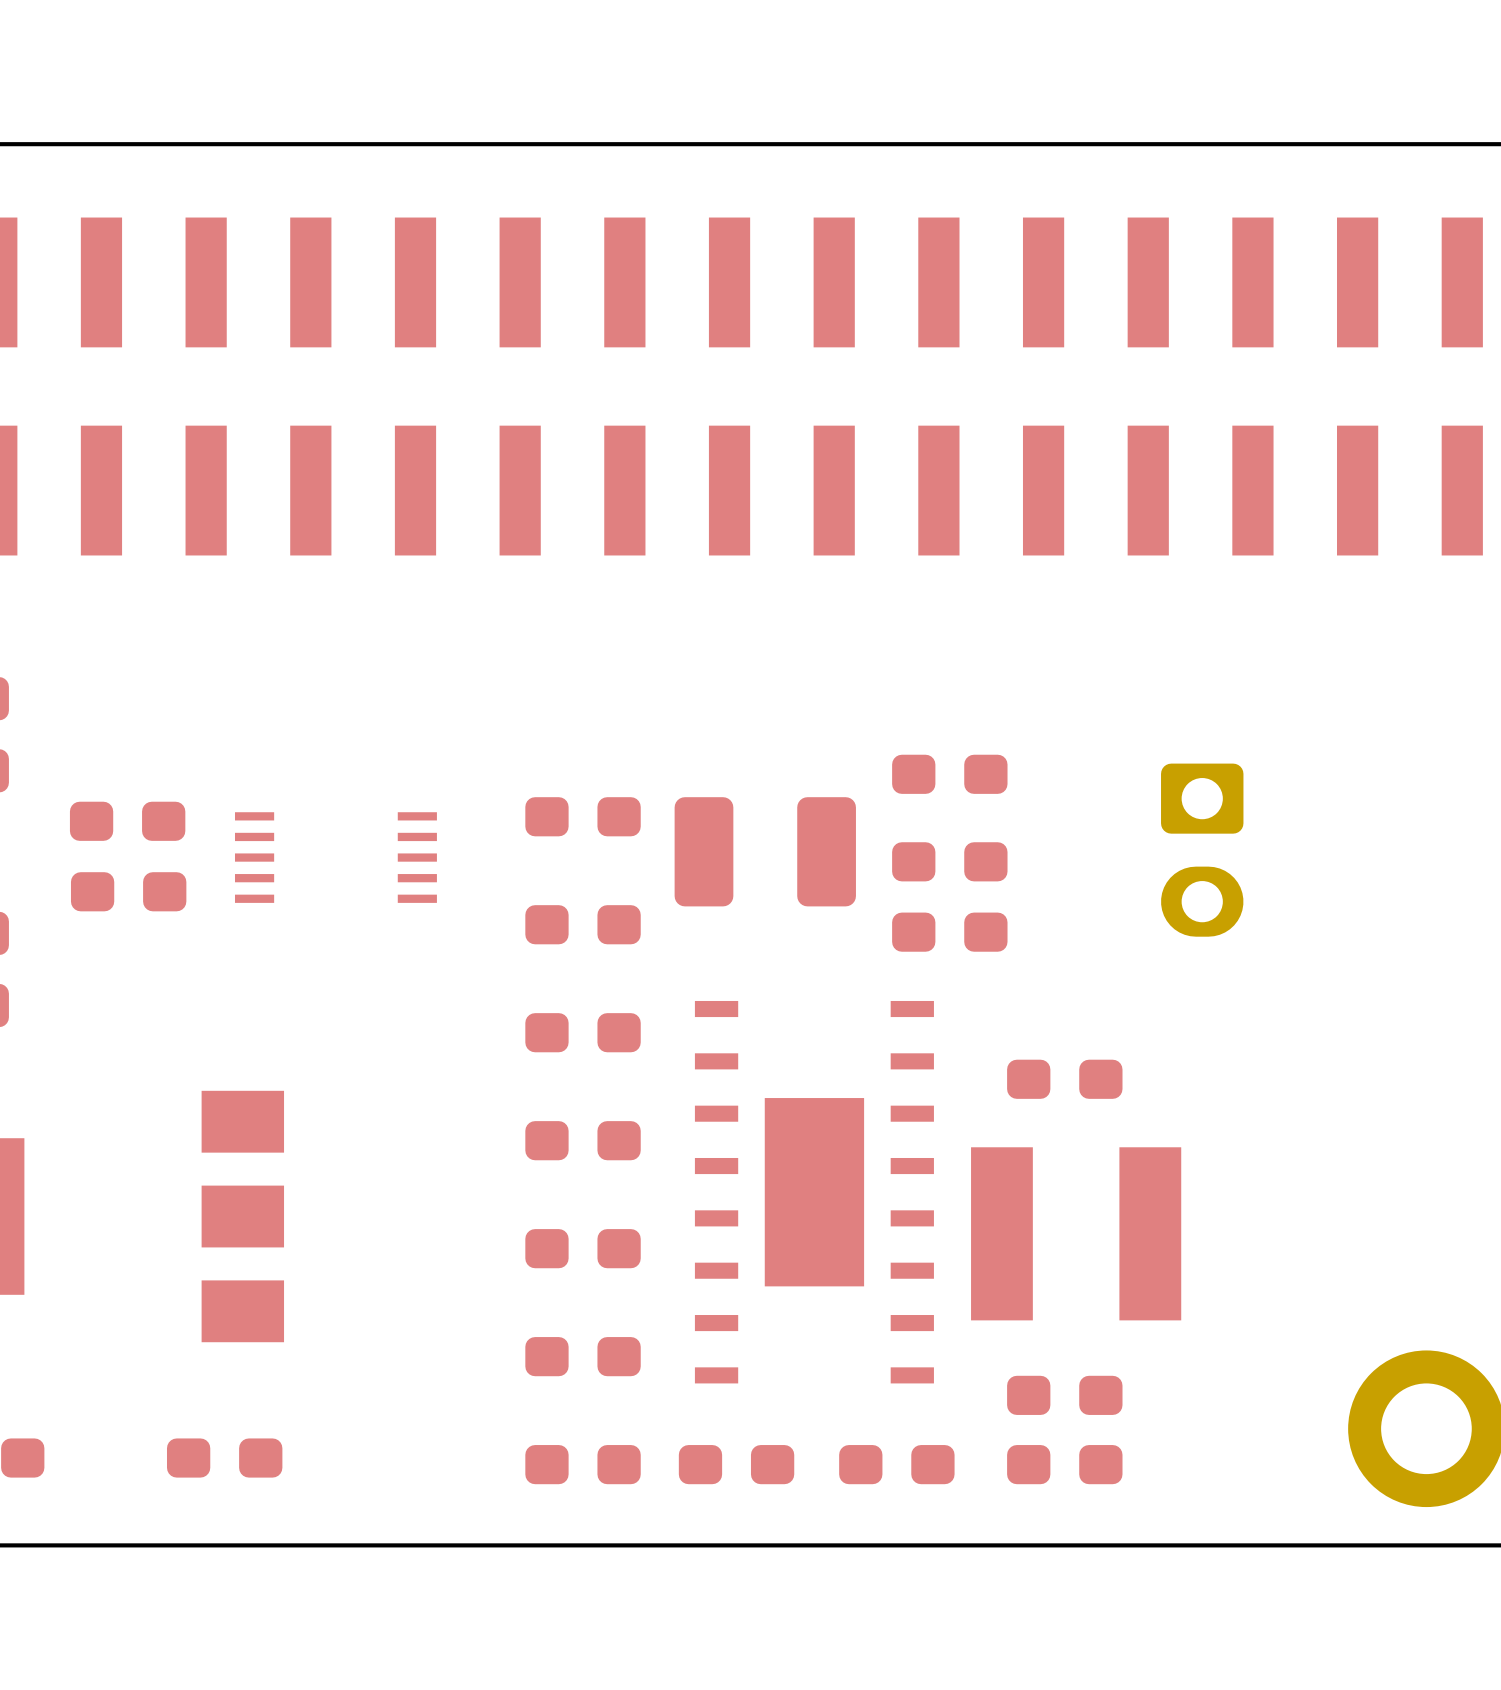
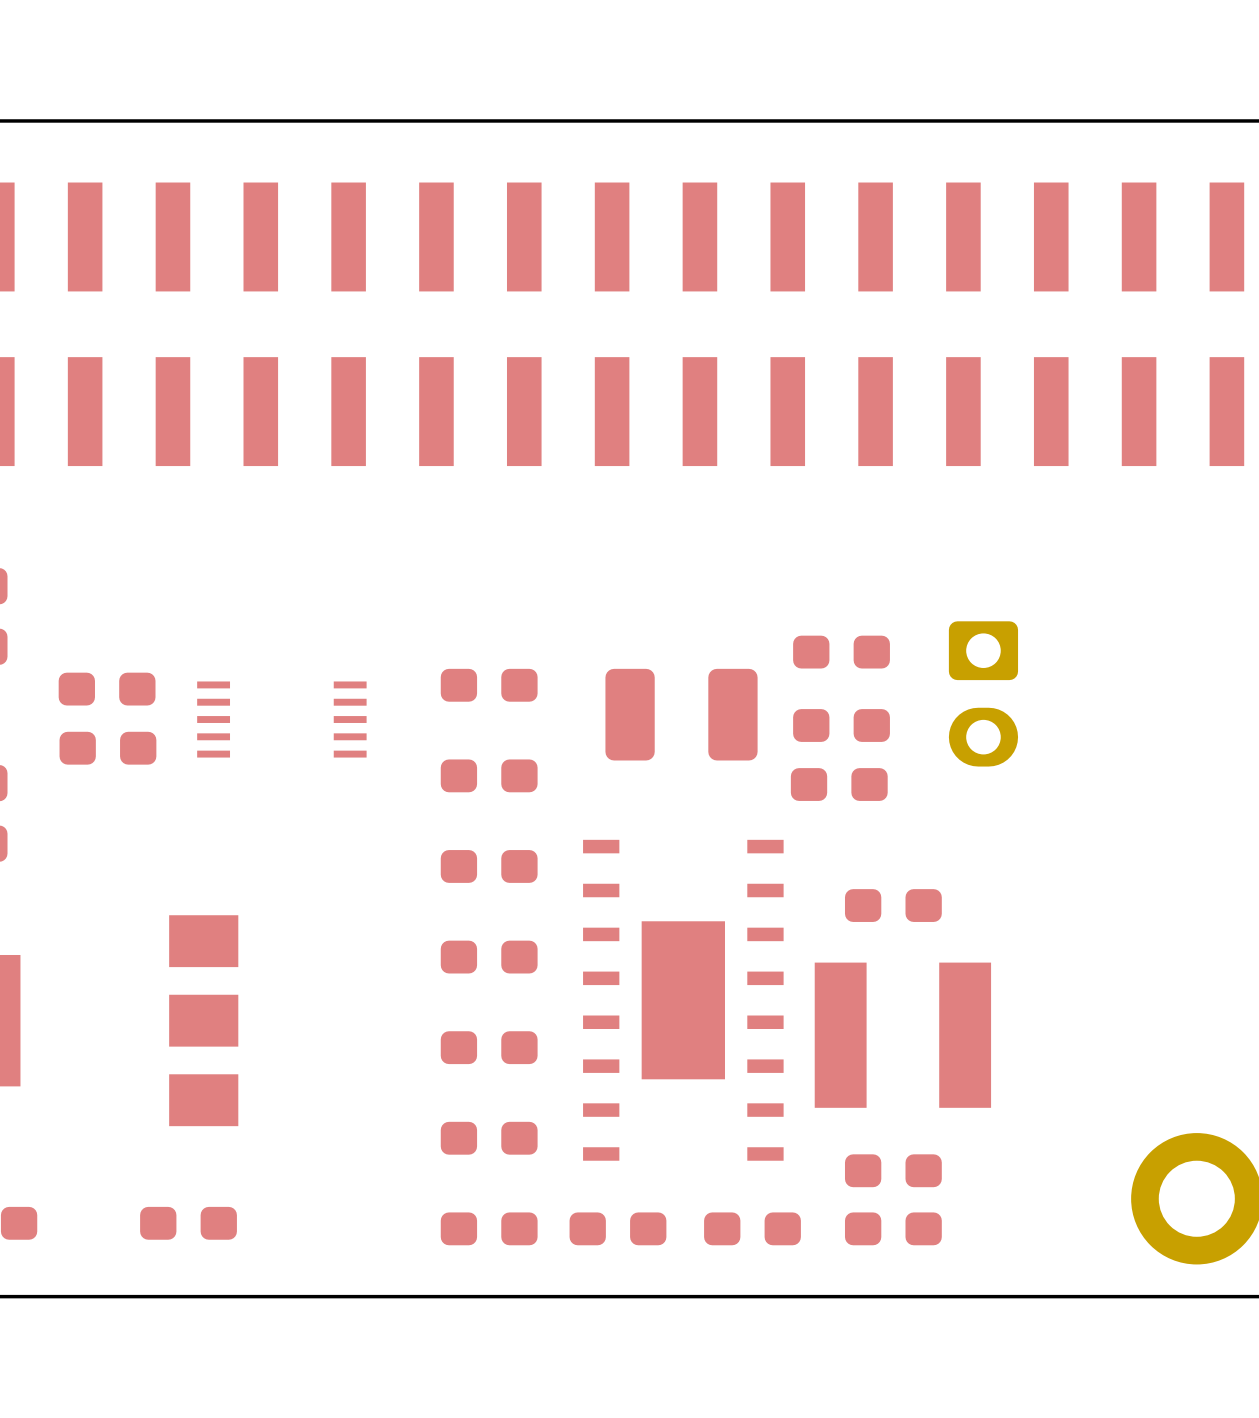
part: (949, 774) -> none
part: none -> (841, 652)
part position: (1202, 850) -> (983, 693)
part position: (765, 851) -> (681, 714)
part: (949, 861) -> none
part: none -> (841, 725)
part: (949, 932) -> none
part: none -> (839, 784)

